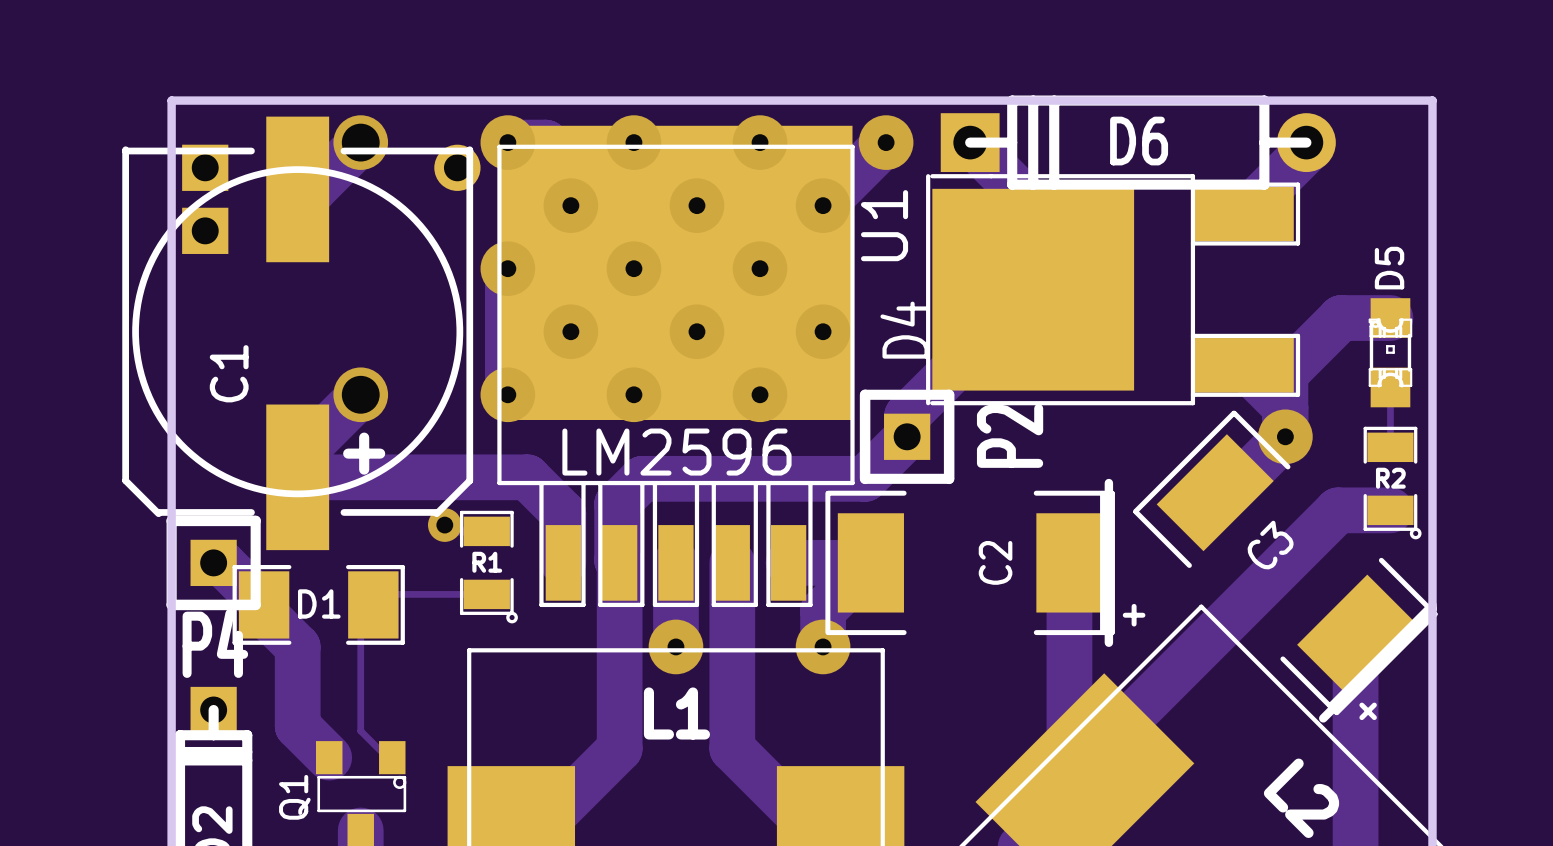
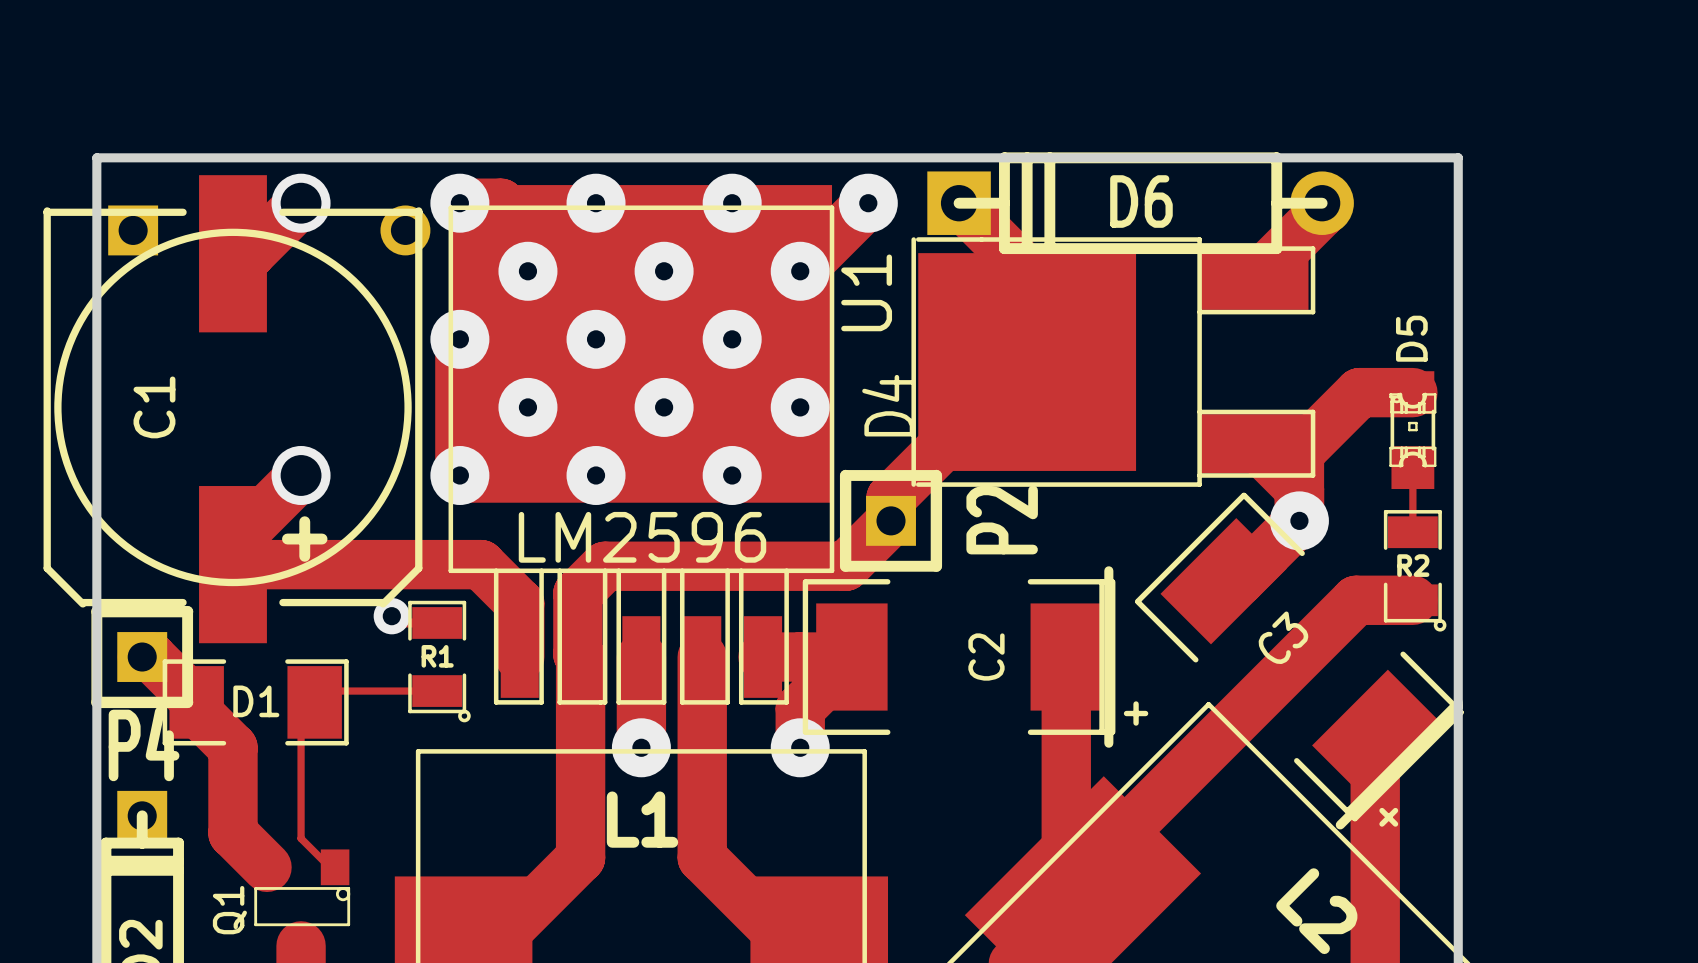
part: (205, 230) -> none
C1 name position: C1 (229, 373) -> C1 (154, 407)

